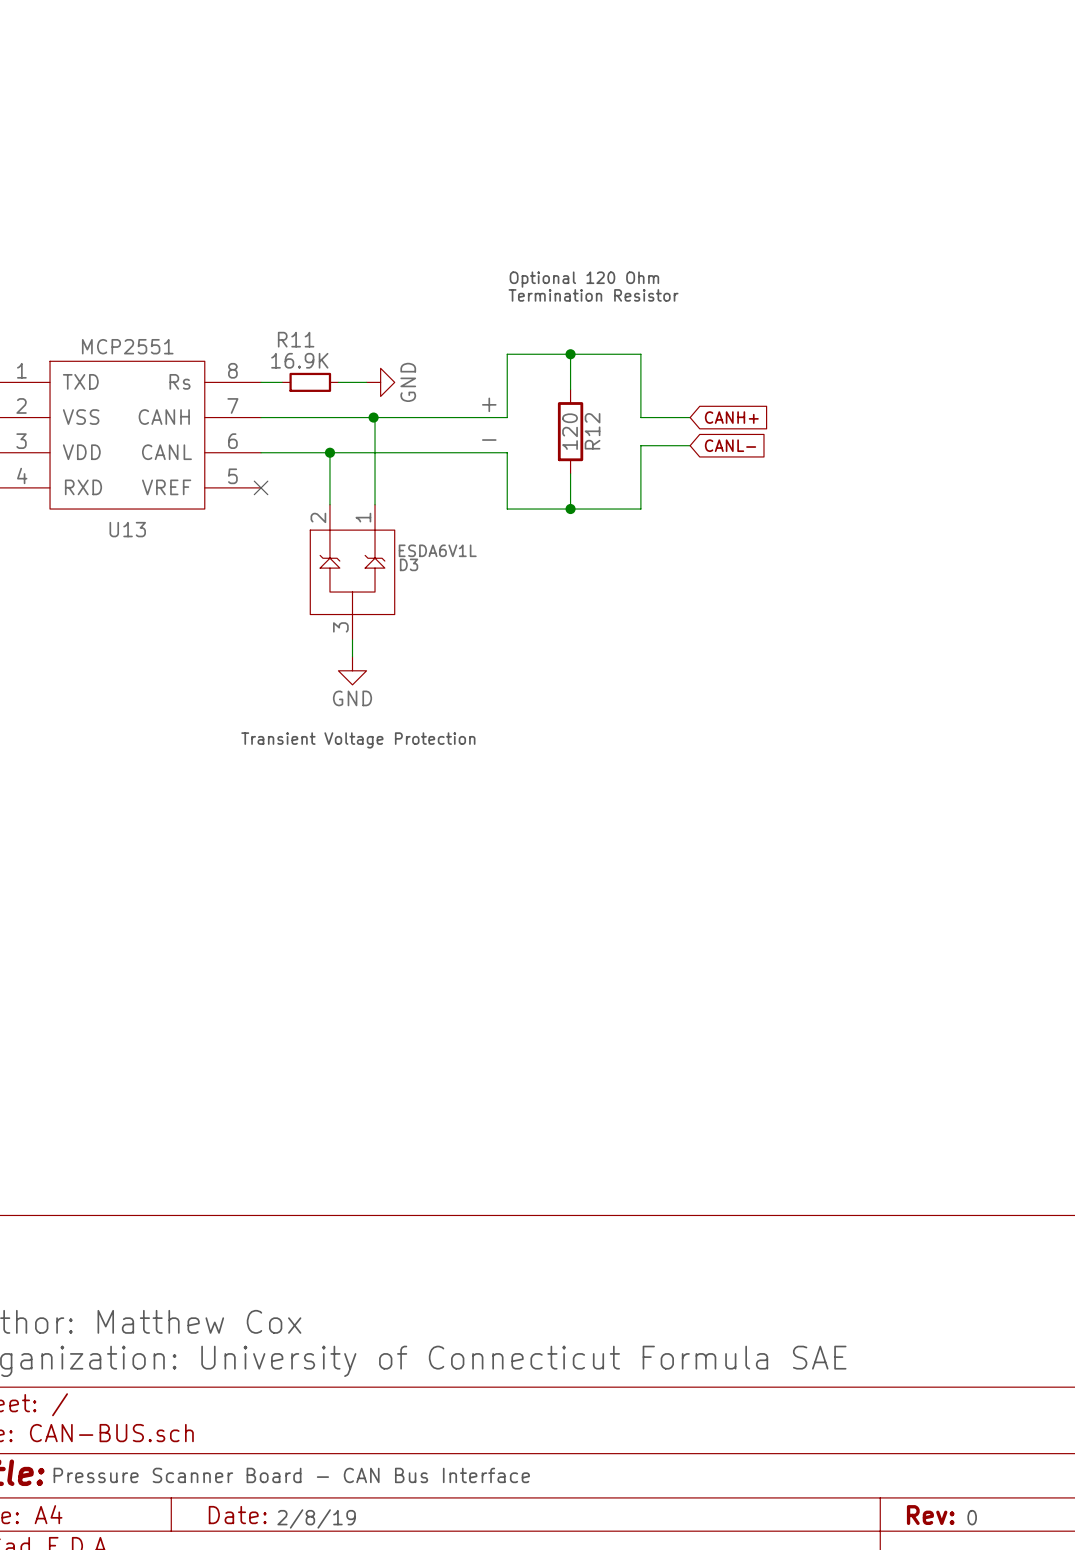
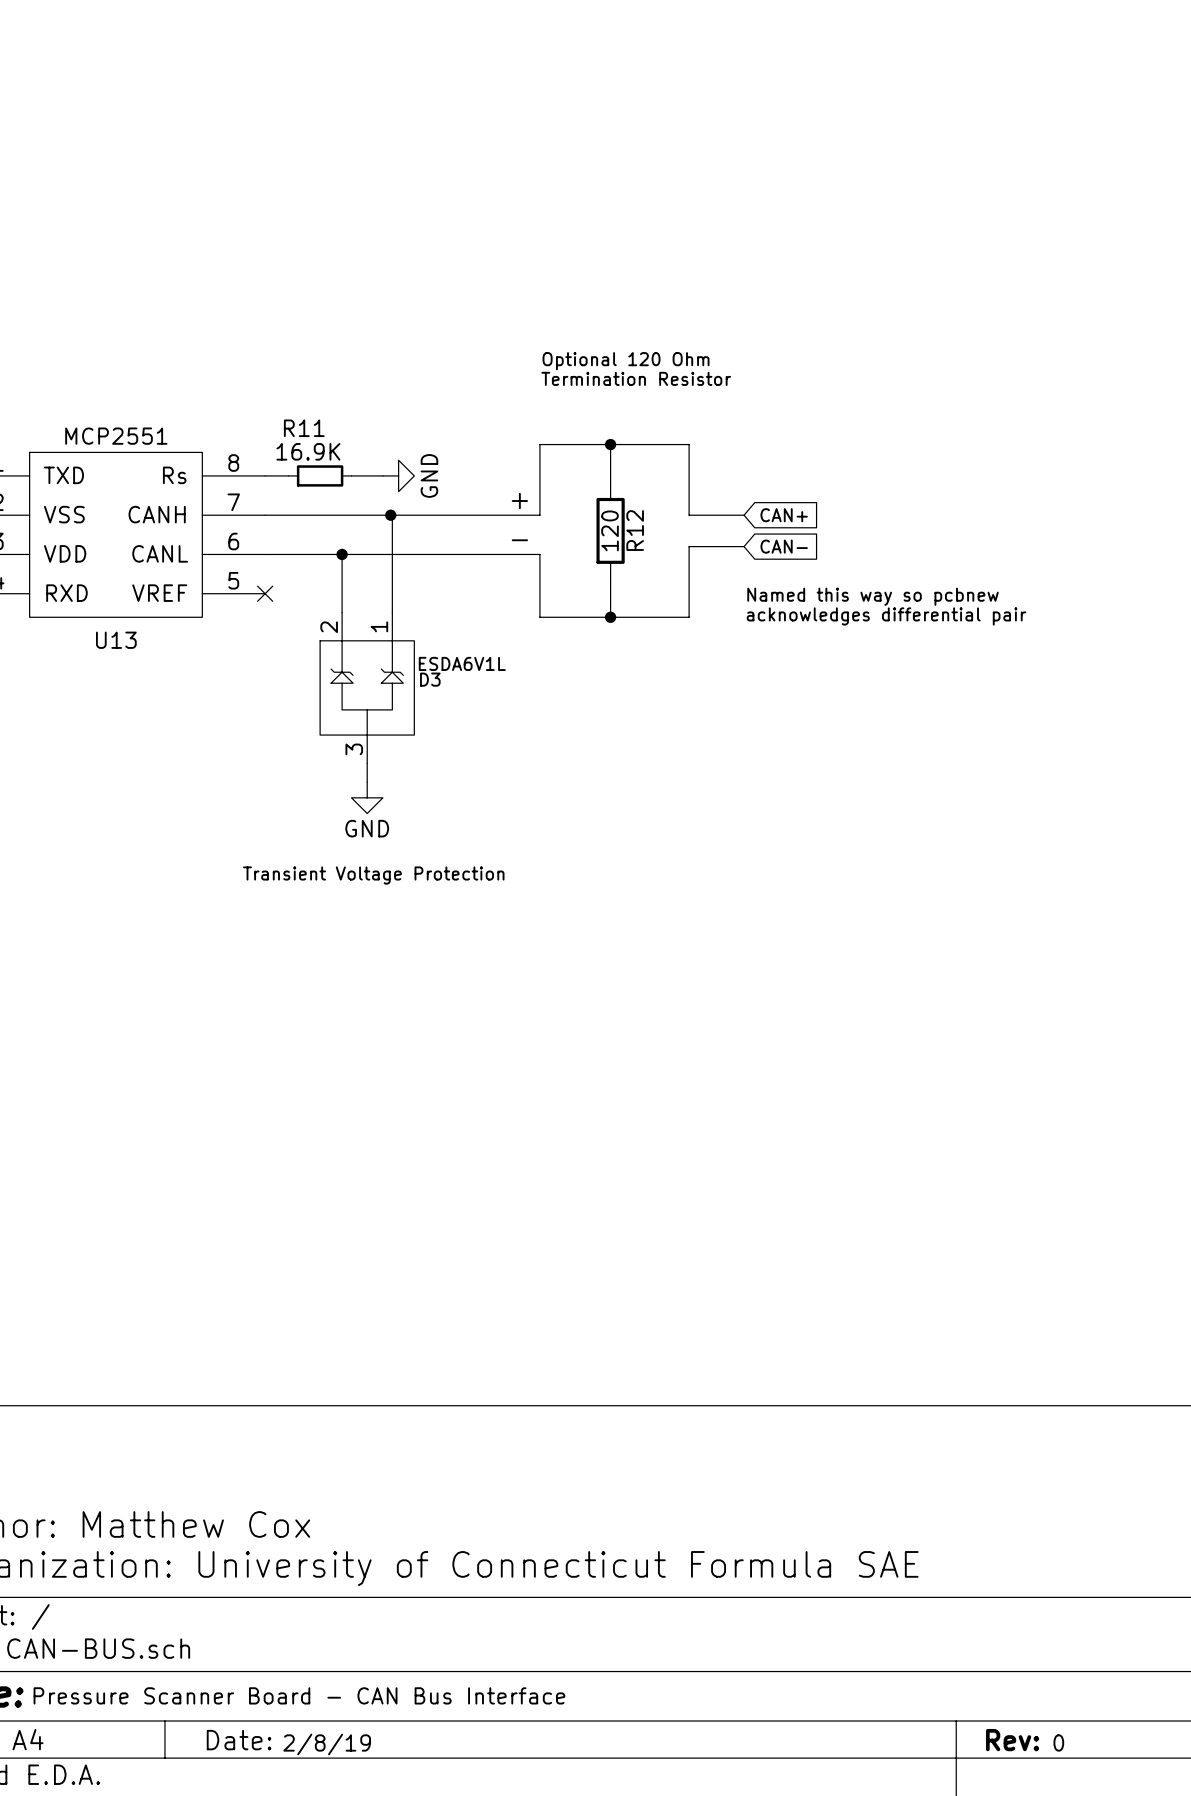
global label: CANH+ (731, 417) -> CAN+ (784, 515)
global label: CANL- (730, 445) -> CAN- (784, 546)
text: none -> Named this way so pcbnew (873, 596)
text: none -> acknowledges differential pair (886, 616)

